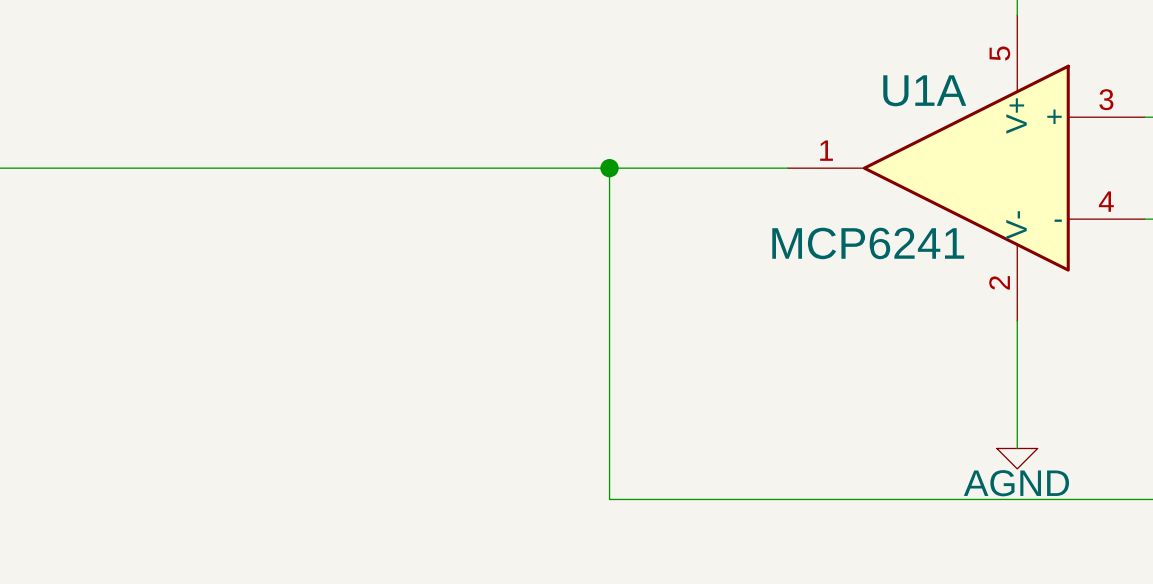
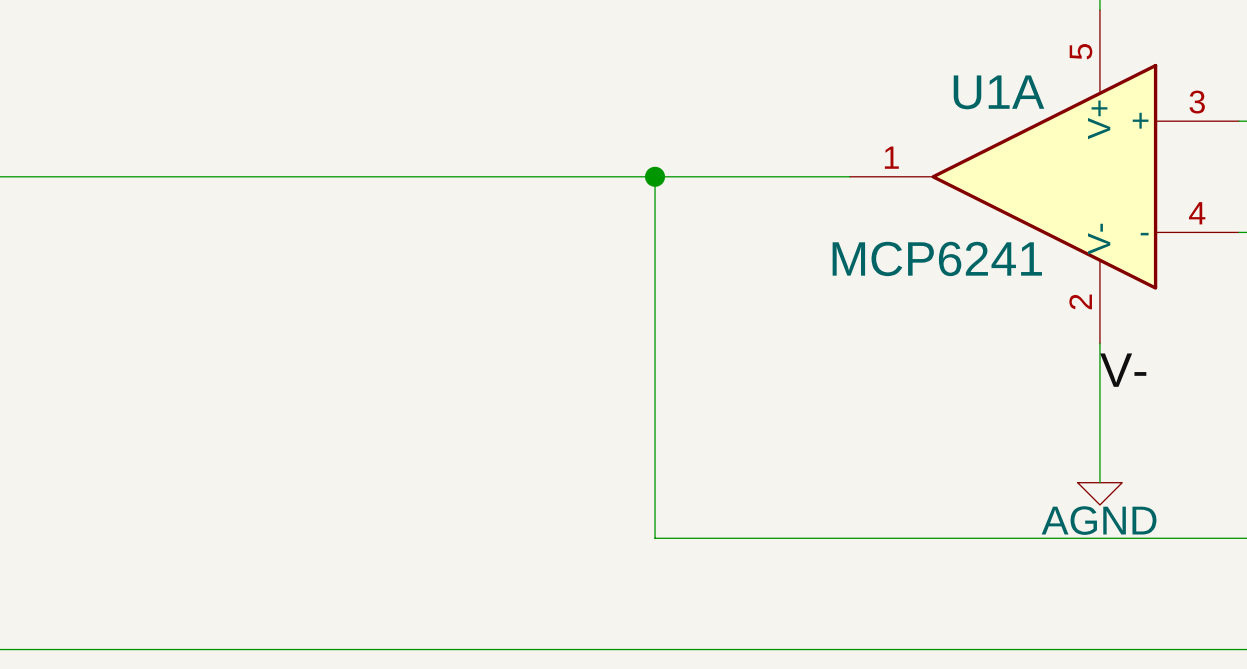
label: none -> V- (1123, 370)

